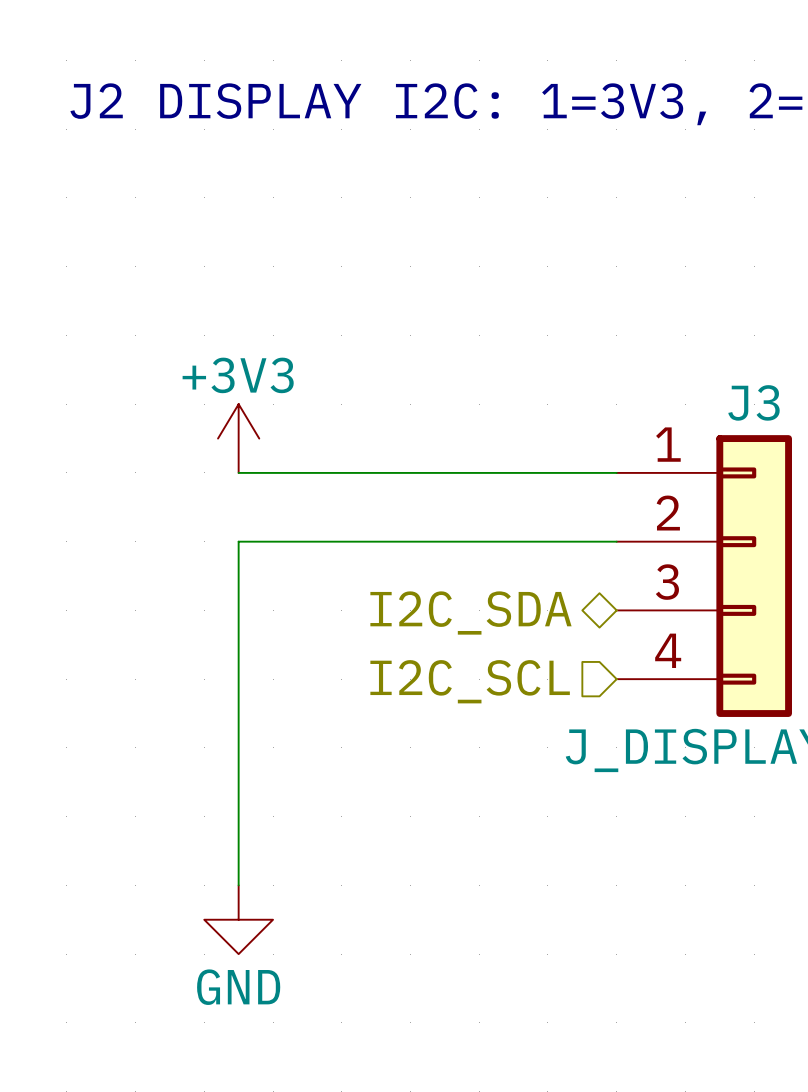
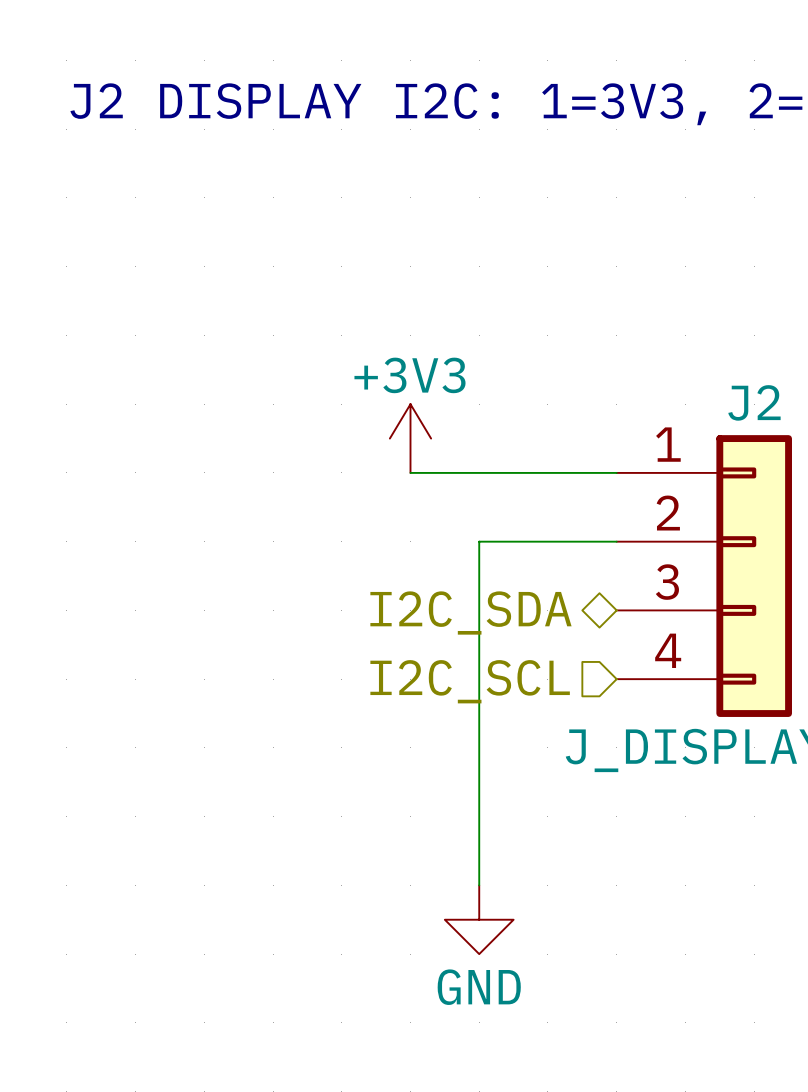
J3 name: J3 (753, 402) -> J2 (754, 402)
power symbol position: +3V3 (238, 438) -> +3V3 (410, 438)
wire: (238, 472) (410, 472) -> none
wire: (479, 541) (238, 541) (238, 885) -> (479, 541) (479, 885)
power symbol position: GND (238, 919) -> GND (479, 919)

